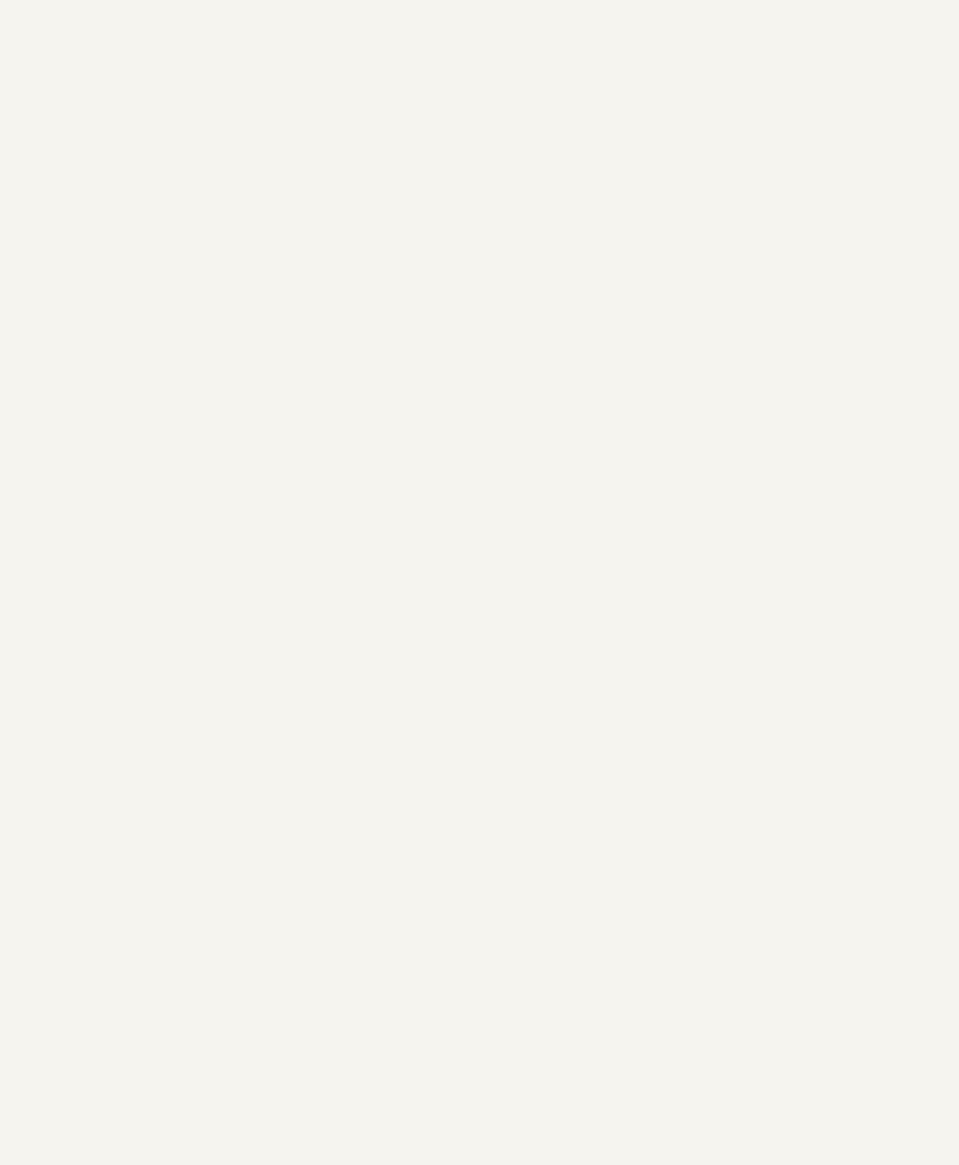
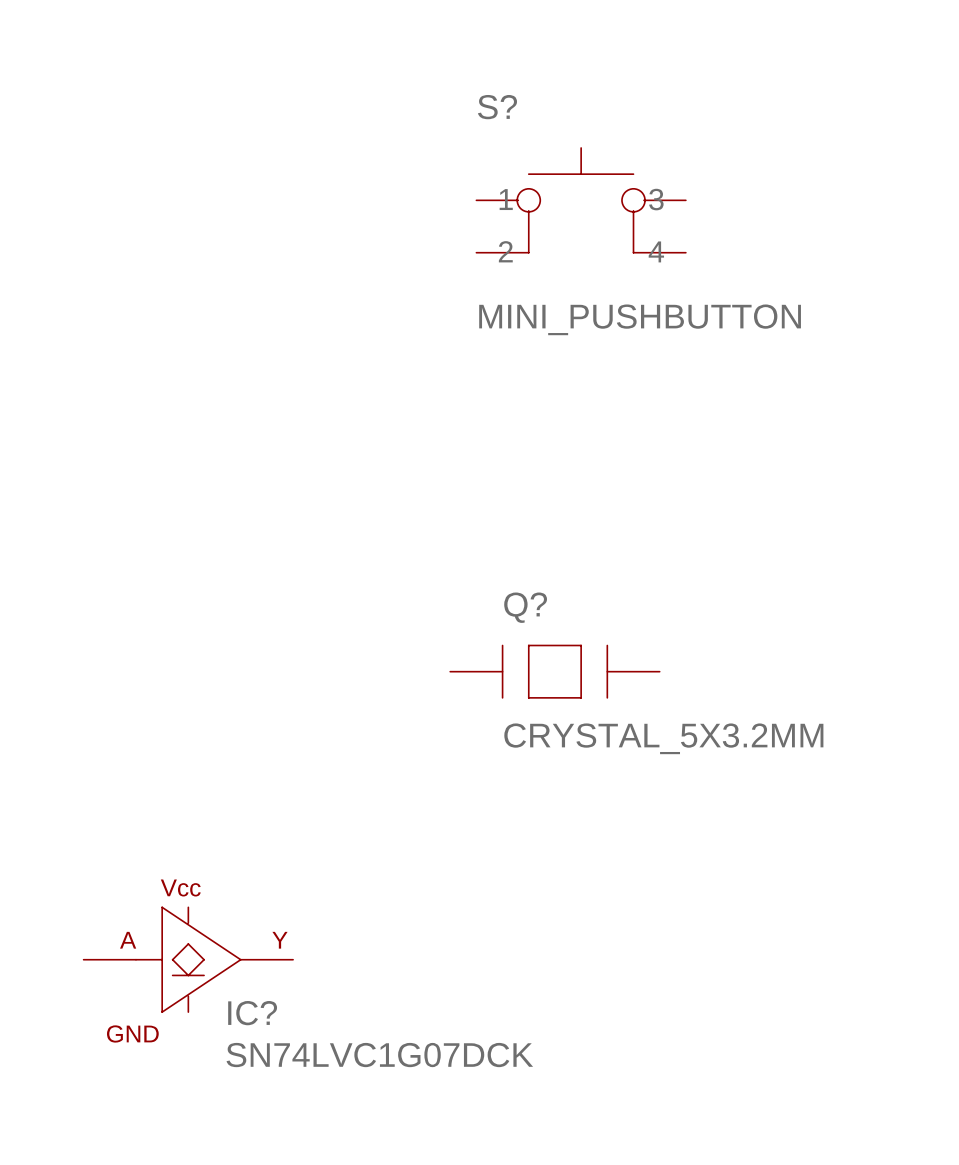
S?: none -> MINI_PUSHBUTTON (581, 200)
Q?: none -> CRYSTAL_5X3.2MM (554, 671)
IC?: none -> SN74LVC1G07DCK (188, 959)

